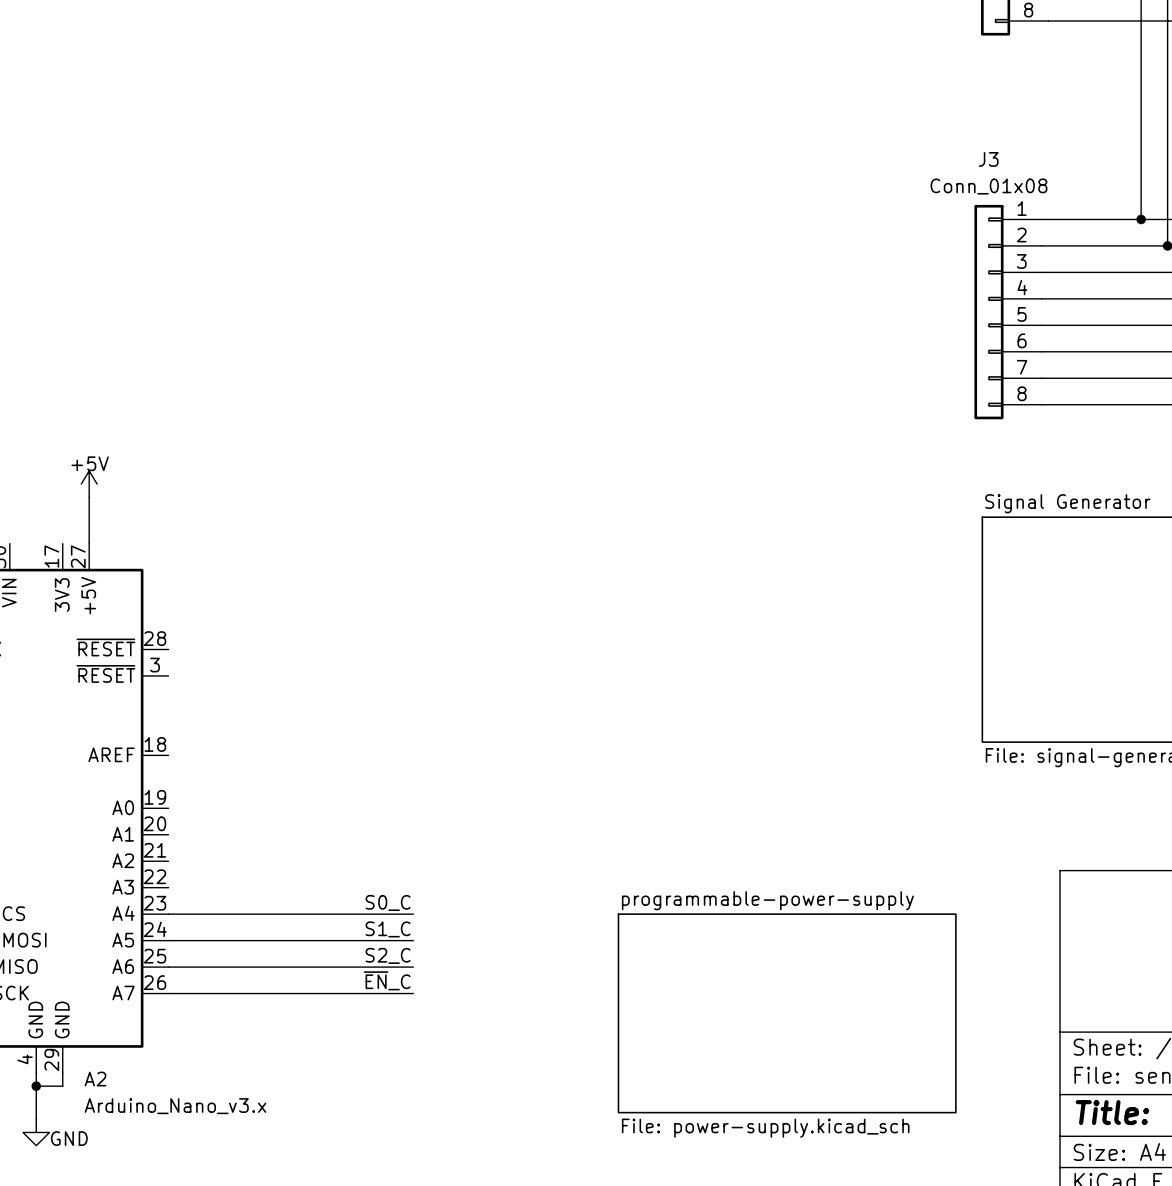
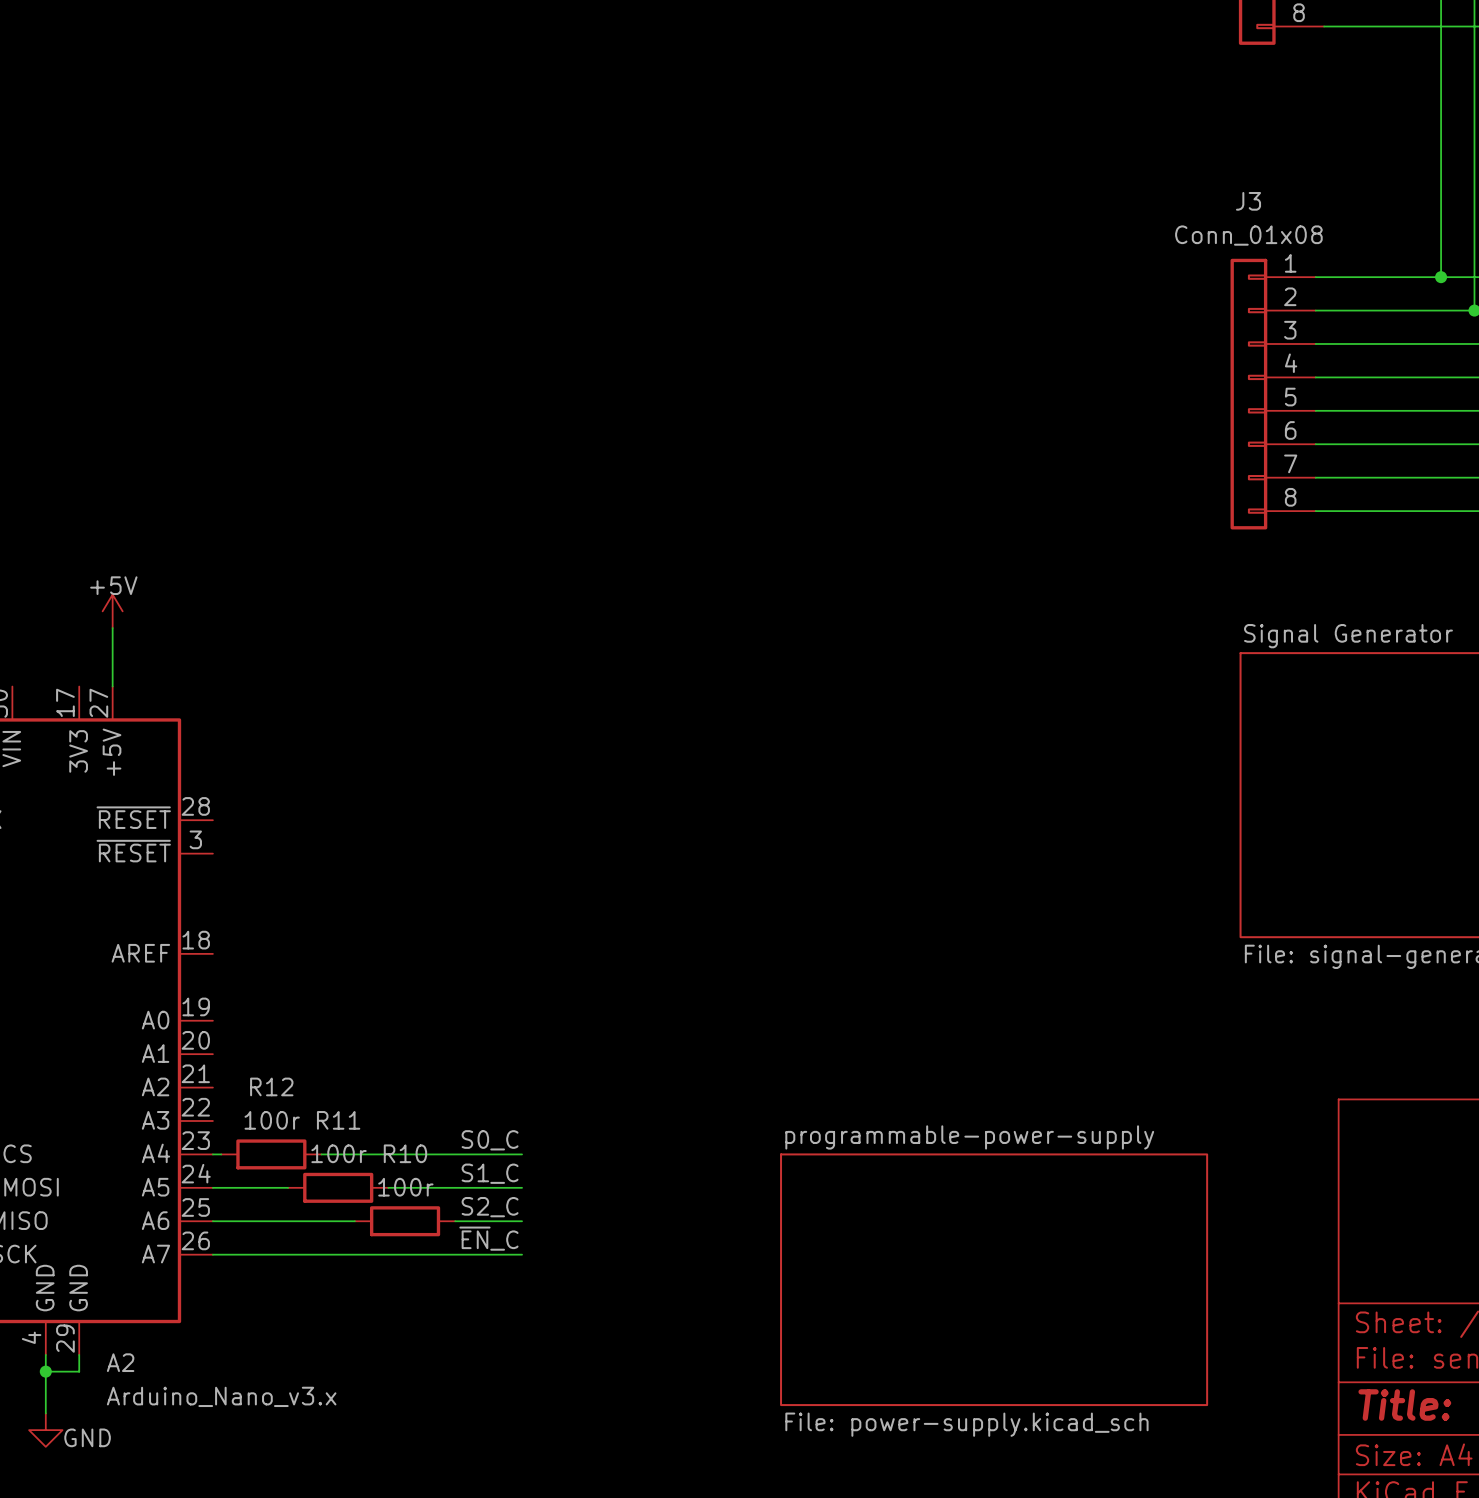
wire: (175, 914) (254, 914) -> none
R12: none -> 100r (271, 1154)
wire: (228, 940) (307, 940) -> none
R11: none -> 100r (338, 1187)
wire: (281, 967) (360, 967) -> none
R10: none -> 100r (405, 1221)

